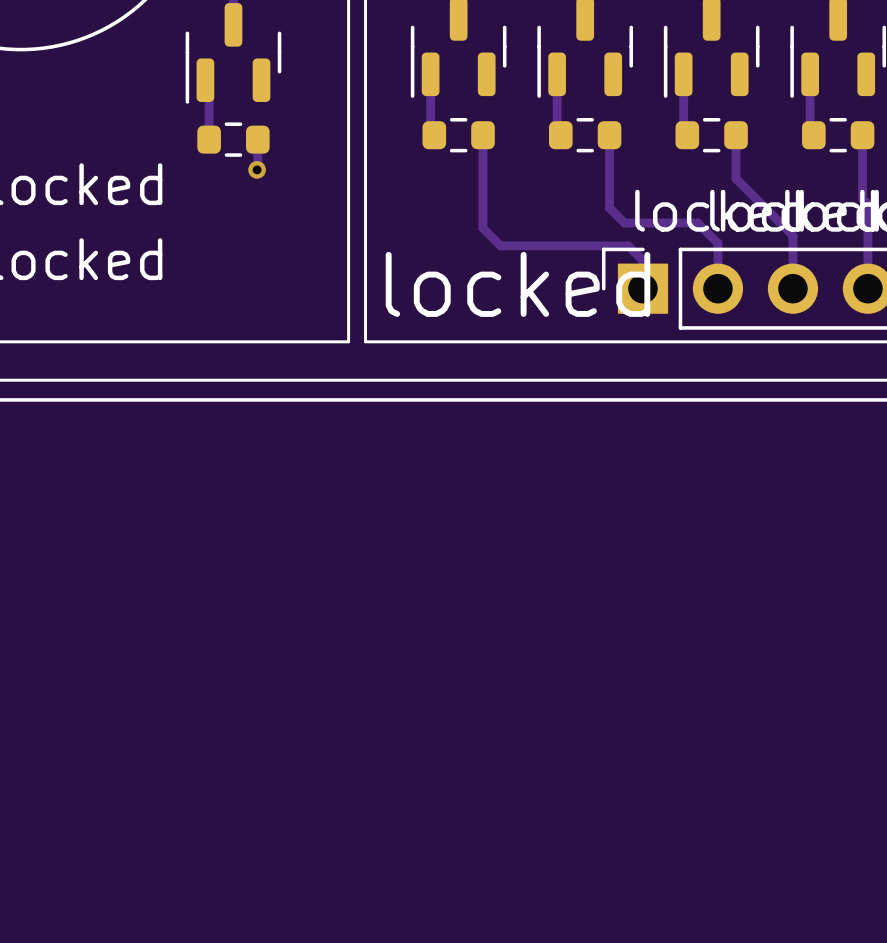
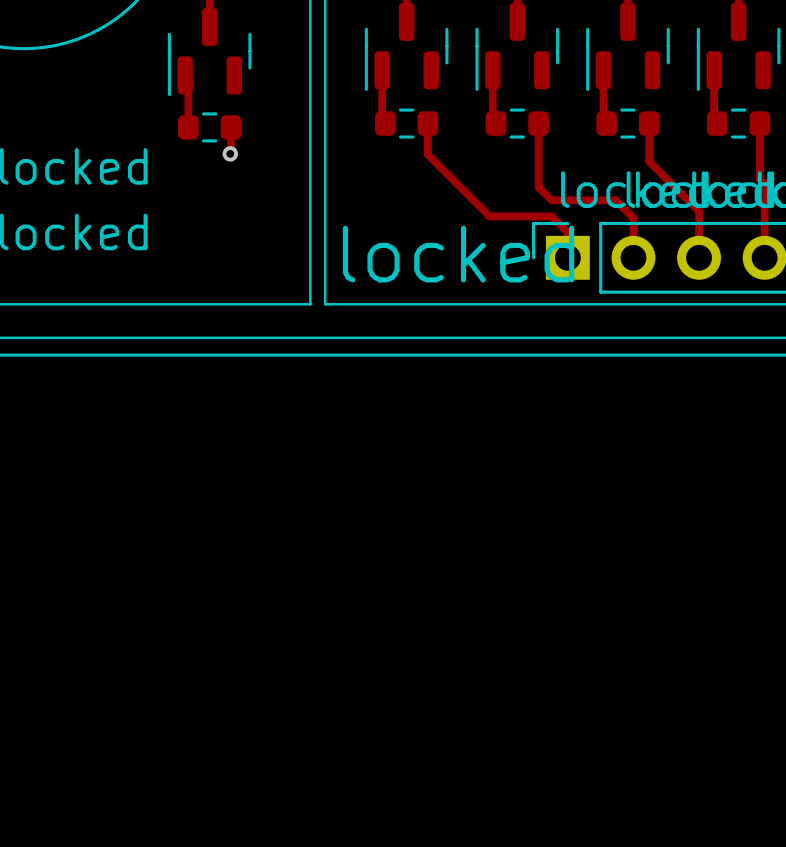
track: (483, 170) (483, 228) (500, 245) (628, 245) (642, 260) -> (427, 154) (489, 216) (551, 216) (567, 233)

